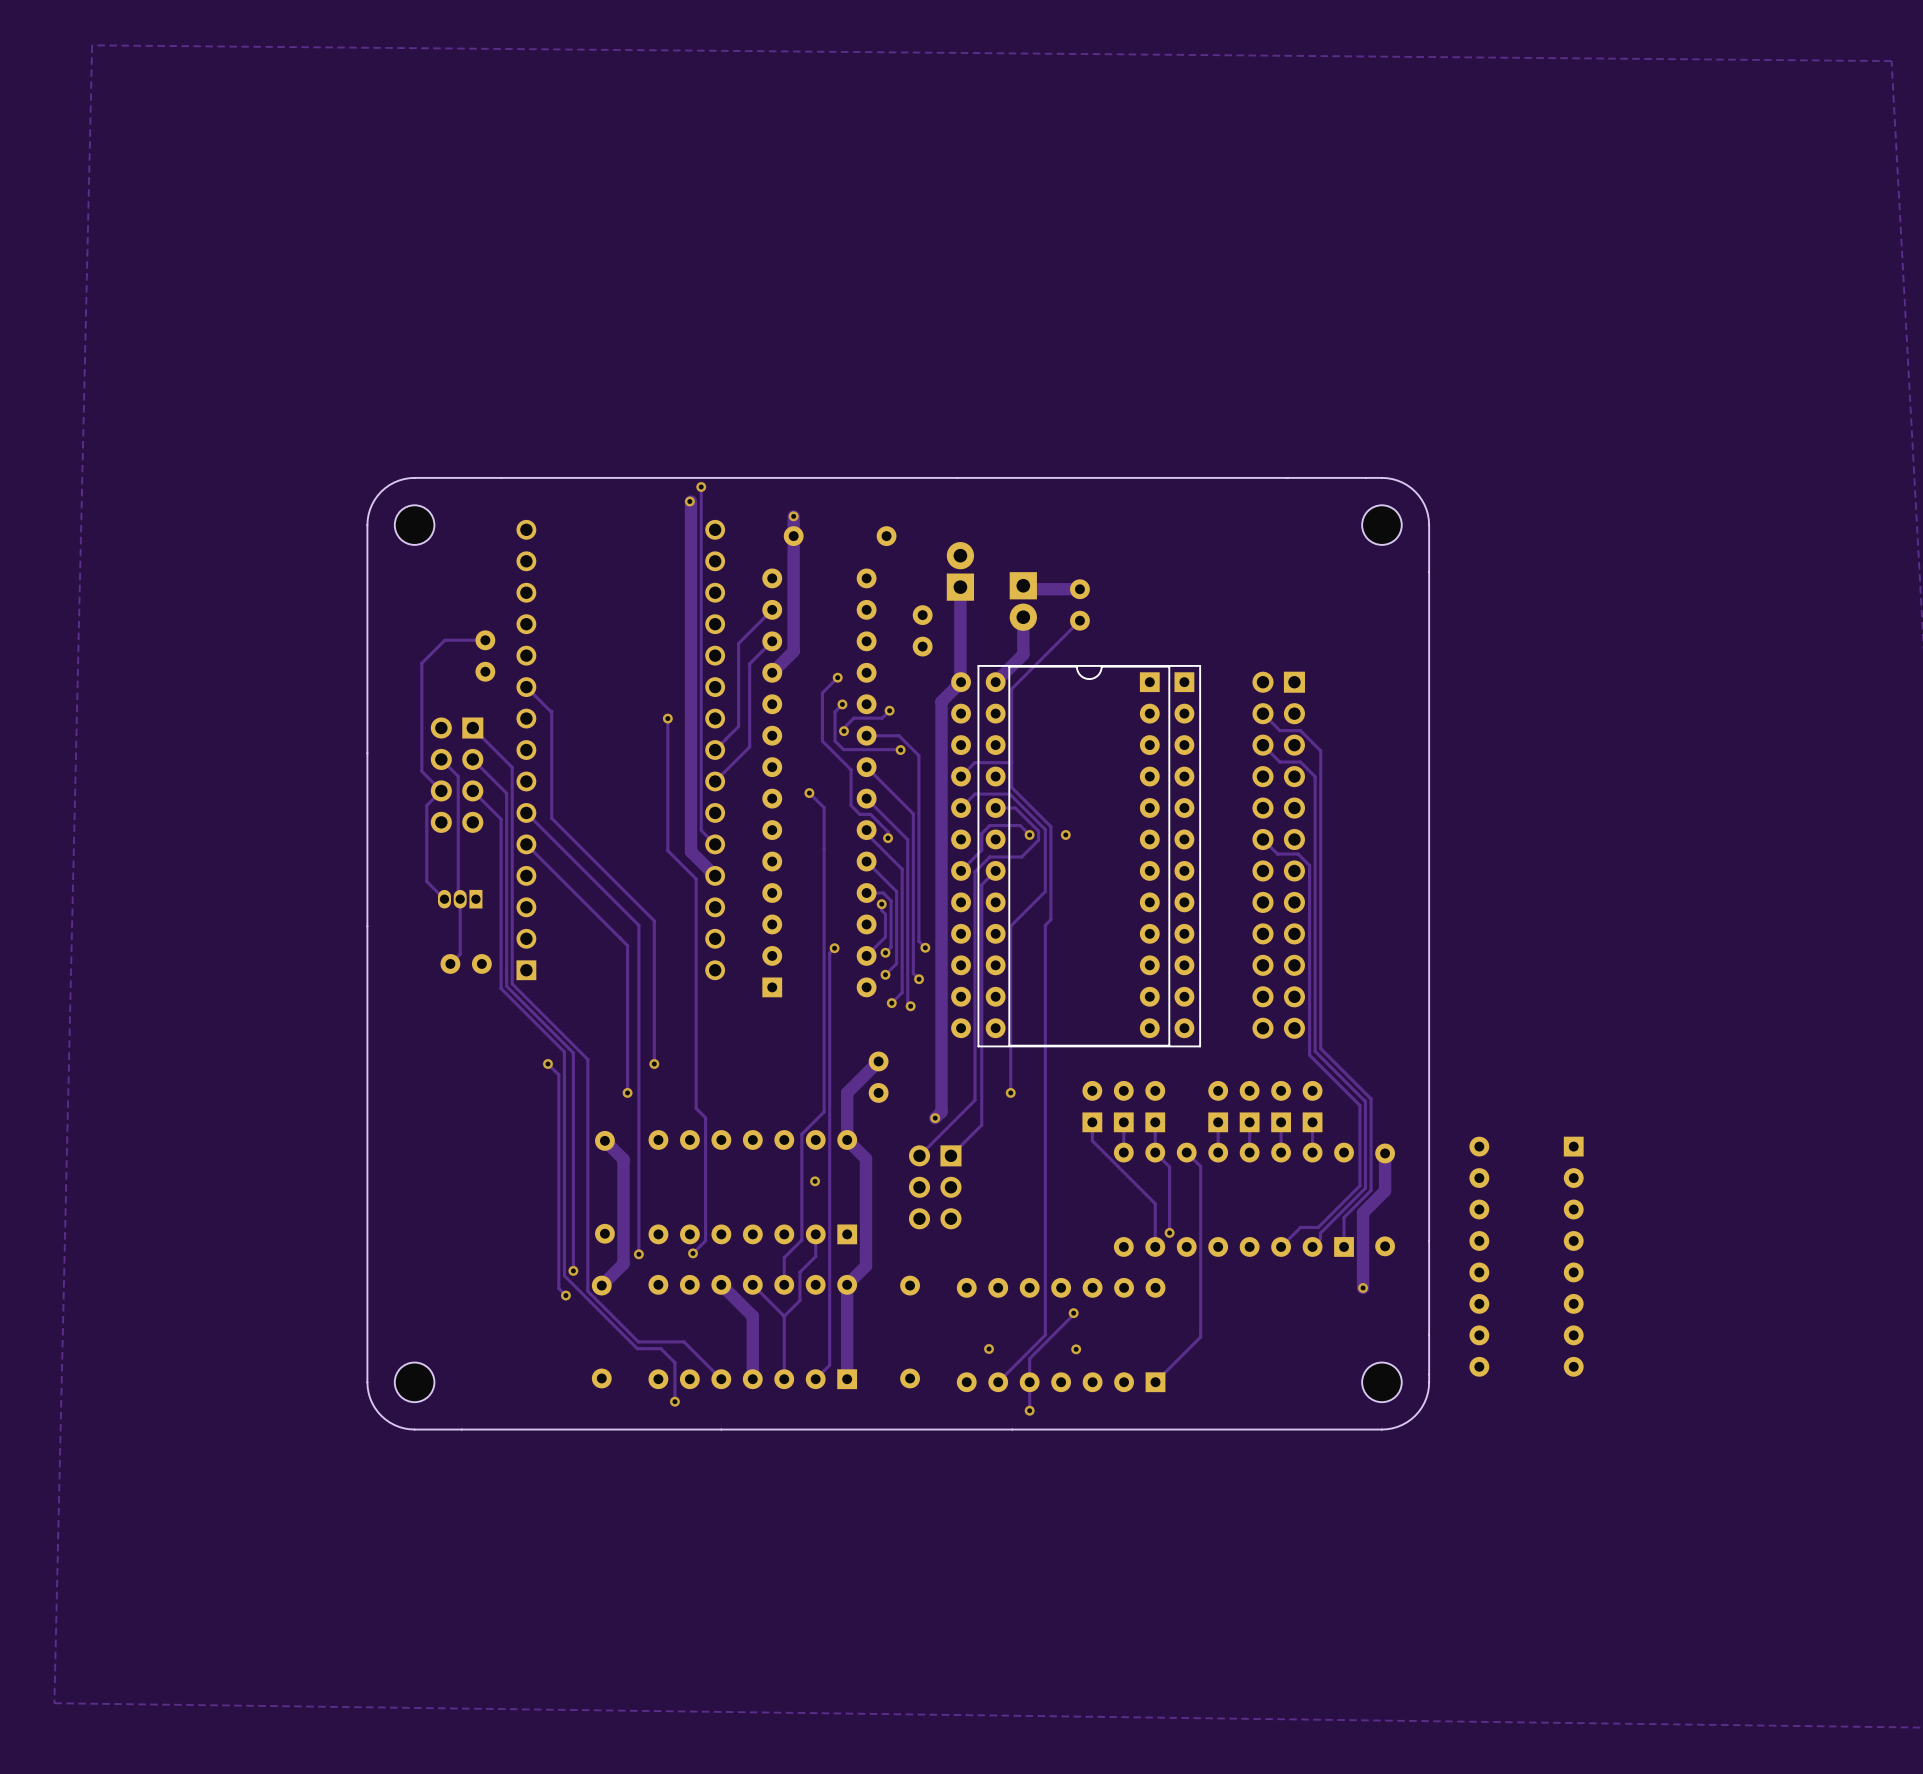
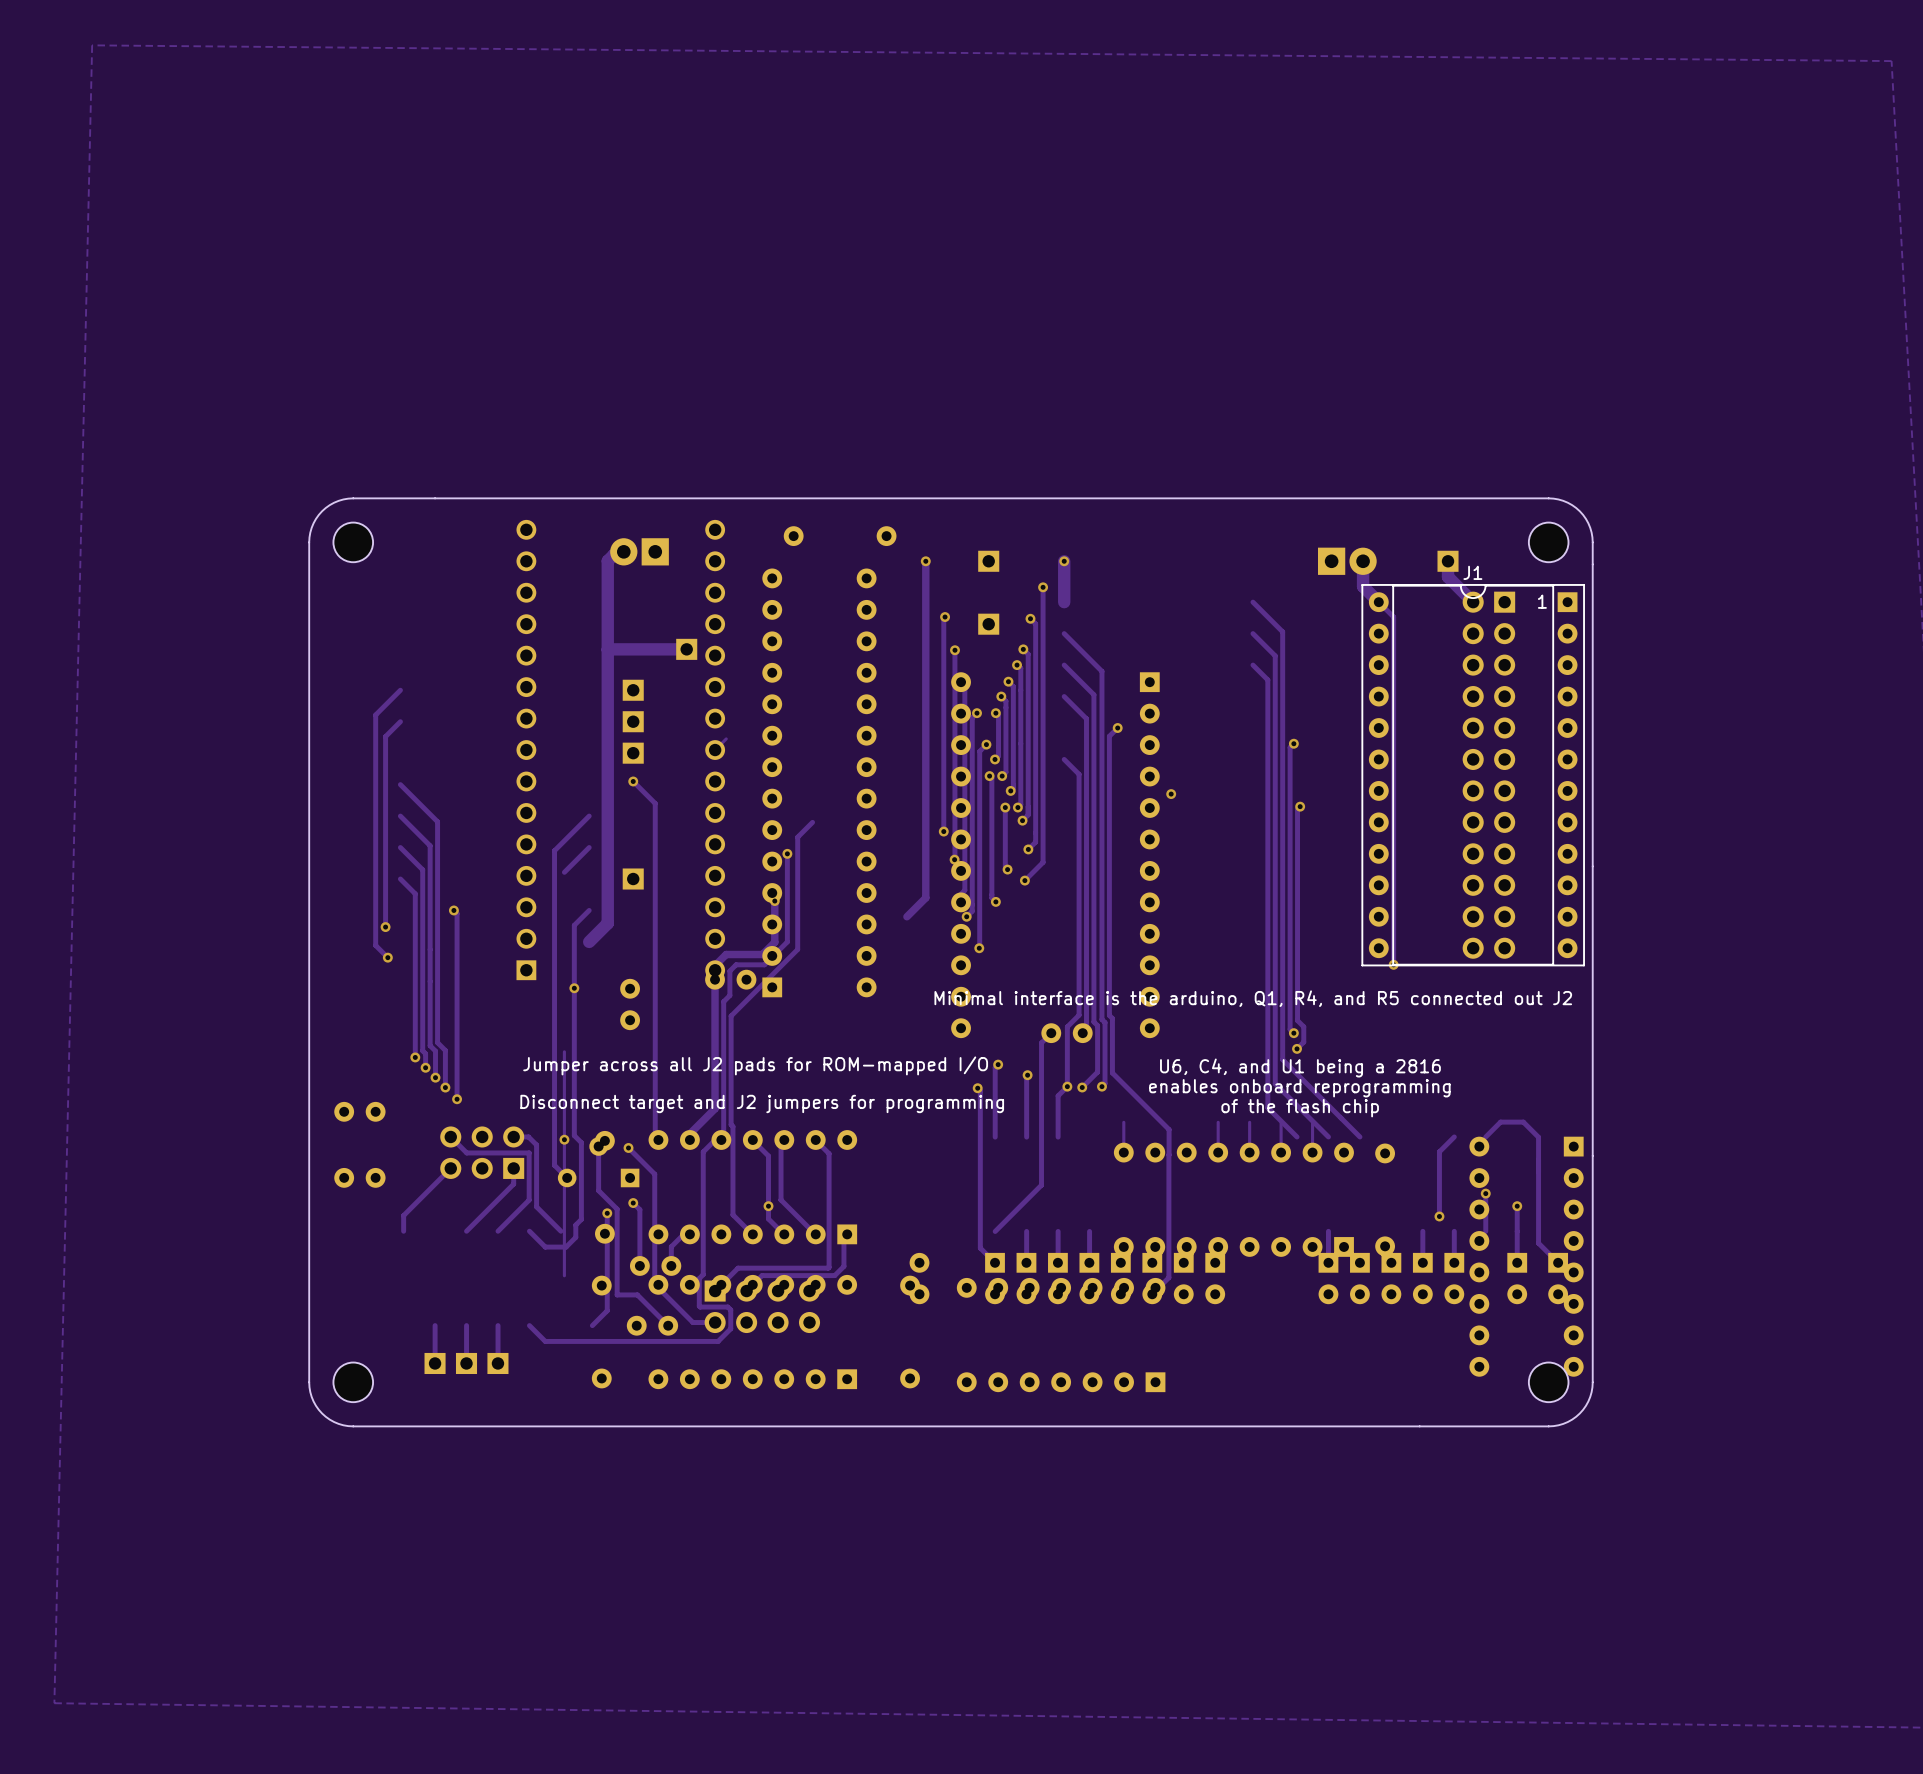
board edge: (1381, 477) (414, 477) (394, 482) (381, 491) (370, 509) (367, 525) (367, 1382) (372, 1402) (381, 1415) (399, 1426) (414, 1429) (1381, 1429) (1402, 1424) (1415, 1415) (1424, 1402) (1429, 1382) (1429, 525) (1426, 509) (1415, 491) (1397, 480) (1381, 477) -> (1548, 498) (1567, 502) (1579, 511) (1588, 523) (1592, 542) (1592, 1382) (1588, 1401) (1576, 1416) (1563, 1423) (1548, 1426) (353, 1426) (334, 1422) (318, 1409) (311, 1396) (309, 1382) (309, 542) (313, 523) (325, 507) (338, 500) (353, 498) (1548, 498)
track: (701, 486) (701, 830) (715, 844) -> none
via: (701, 486) -> none
via: (689, 501) -> none
track: (691, 501) (691, 851) (715, 875) -> none
track: (793, 516) (793, 651) (772, 672) -> none
via: (793, 516) -> none
part position: (414, 525) -> (353, 542)
part position: (1381, 525) -> (1548, 542)
part: none -> (639, 551)
track: none -> (626, 554) (613, 554) (607, 560) (607, 923) (589, 941)
track: none -> (925, 561) (925, 897) (906, 916)
via: none -> (925, 561)
part: none -> (988, 561)
track: none -> (1064, 561) (1064, 602)
via: none -> (1064, 561)
part: none -> (1347, 561)
track: none -> (1363, 561) (1363, 586) (1393, 617) (1393, 964)
track: none -> (1448, 561) (1448, 577) (1473, 602)
part: none -> (1448, 561)
part: (960, 571) -> none
track: (1023, 585) (1026, 589) (1079, 589) -> none
track: (960, 587) (961, 682) (941, 701) (941, 1111) (935, 1118) -> none
track: none -> (1043, 587) (1043, 862) (1024, 880)
via: none -> (1043, 587)
part: (1023, 601) -> none
text: none -> 1 (1542, 601)
track: none -> (1252, 602) (1282, 631) (1282, 1059) (1359, 1136)
part: (1079, 604) -> none
track: (772, 609) (738, 643) (738, 726) (726, 738) -> none
track: none -> (945, 617) (943, 831)
via: none -> (945, 617)
track: (1023, 617) (1023, 654) (995, 682) -> none
track: none -> (1030, 618) (1035, 623) (1035, 842) (1028, 849)
via: none -> (1030, 618)
track: (1079, 620) (1011, 688) (1011, 787) (1050, 826) (1050, 919) (1045, 925) (1045, 1335) (998, 1382) -> none
part: none -> (988, 624)
part: (922, 630) -> none
track: none -> (1064, 633) (1101, 671) (1101, 1019) (1105, 1022) (1105, 1083) (1101, 1086)
track: none -> (1252, 633) (1275, 655) (1275, 1083) (1328, 1136)
track: (485, 640) (444, 640) (421, 663) (421, 771) (441, 790) (426, 805) (426, 881) (444, 899) -> none
track: (772, 641) (749, 663) (749, 746) (715, 781) -> none
track: none -> (686, 649) (607, 649)
part: none -> (686, 649)
track: none -> (1023, 649) (1028, 654) (1028, 814) (1022, 820)
via: none -> (1023, 649)
track: none -> (954, 650) (954, 859)
via: none -> (954, 650)
part: (485, 656) -> none
track: none -> (1017, 665) (1020, 668) (1020, 804) (1017, 807)
via: none -> (1017, 665)
track: none -> (1064, 665) (1093, 694) (1093, 1021) (1097, 1025) (1097, 1072) (1082, 1087)
track: none -> (1252, 665) (1267, 679) (1267, 1107) (1297, 1136)
track: (837, 677) (822, 692) (822, 741) (851, 769) (851, 805) (859, 814) (870, 814) (888, 831) (888, 838) -> none
via: (837, 677) -> none
track: none -> (1008, 681) (1013, 686) (1013, 788) (1010, 790)
via: none -> (1008, 681)
track: none -> (964, 682) (964, 890) (960, 894)
track: (526, 687) (551, 711) (551, 818) (654, 920) (654, 1063) -> none
track: none -> (400, 690) (375, 715) (375, 945) (387, 957)
part: none -> (633, 690)
track: none -> (1001, 696) (1005, 701) (1005, 772) (1002, 776)
via: none -> (1001, 696)
track: none -> (1064, 696) (1086, 718) (1086, 1029) (1082, 1033)
track: (842, 704) (835, 711) (835, 741) (843, 749) (900, 750) -> none
via: (842, 704) -> none
track: (889, 710) (882, 718) (853, 718) (844, 728) (844, 731) -> none
via: (889, 710) -> none
track: none -> (977, 713) (972, 717) (972, 911) (966, 916)
via: none -> (977, 713)
track: none -> (995, 713) (998, 715) (998, 755) (995, 759)
via: none -> (995, 713)
track: (1262, 713) (1279, 730) (1300, 730) (1320, 750) (1320, 1048) (1371, 1098) (1371, 1190) (1344, 1217) (1344, 1246) -> none
track: (667, 718) (667, 850) (696, 879) (696, 1108) (705, 1117) (705, 1240) (693, 1253) -> none
via position: (667, 718) -> (633, 781)
track: none -> (400, 721) (385, 736) (385, 927)
part: none -> (633, 721)
track: (472, 728) (512, 767) (512, 983) (587, 1059) (587, 1291) (638, 1341) (684, 1341) (721, 1379) -> none
track: none -> (1117, 728) (1109, 736) (1109, 1015) (1112, 1018) (1112, 1072) (1169, 1129) (1168, 1277) (1152, 1294)
via: none -> (1117, 728)
via: (844, 731) -> none
track: (866, 735) (899, 735) (918, 755) (918, 941) (925, 947) -> none
track: none -> (1293, 743) (1290, 747) (1290, 1029) (1293, 1033)
via: none -> (1293, 743)
track: none -> (986, 744) (979, 751) (979, 948)
via: none -> (986, 744)
track: (1262, 745) (1279, 762) (1300, 762) (1315, 776) (1315, 1051) (1365, 1101) (1365, 1188) (1320, 1233) (1320, 1239) (1312, 1246) -> none
via: (900, 750) -> none
part: none -> (633, 753)
track: (441, 759) (458, 776) (460, 954) (450, 963) -> none
track: (472, 759) (506, 793) (506, 986) (573, 1052) (573, 1270) -> none
via: none -> (995, 759)
track: none -> (1064, 759) (1079, 774) (1079, 1015) (1067, 1026) (1067, 1086) (1058, 1095) (1058, 1137)
track: (1011, 762) (974, 762) (961, 776) -> none
track: (866, 767) (913, 813) (913, 973) (919, 979) -> none
part: (457, 775) -> none
J1: none -> (1473, 775)
track: none -> (989, 776) (991, 778) (991, 897) (995, 901)
via: none -> (989, 776)
via: none -> (1002, 776)
track: none -> (633, 781) (655, 803) (655, 1136)
track: none -> (400, 784) (437, 821) (437, 1042) (445, 1050) (445, 1087)
track: (472, 790) (501, 819) (501, 988) (564, 1051) -> none
via: none -> (1010, 790)
track: (809, 793) (824, 807) (824, 1111) (801, 1134) (801, 1240) (784, 1257) (784, 1284) -> none
via: (809, 793) -> none
via: none -> (1171, 794)
track: (866, 798) (907, 839) (907, 1003) (910, 1006) -> none
track: none -> (1300, 806) (1297, 809) (1297, 1020) (1303, 1026) (1303, 1042) (1297, 1048)
via: none -> (1300, 806)
track: none -> (1005, 807) (1005, 870)
via: none -> (1005, 807)
via: none -> (1017, 807)
track: (961, 808) (974, 794) (1009, 794) (1045, 829) (1045, 891) (1010, 926) (1010, 1092) -> none
track: (995, 808) (1015, 808) (1038, 831) (1038, 840) (1021, 856) (989, 856) (974, 871) (974, 1100) (919, 1155) -> none
track: (526, 812) (638, 925) (638, 1254) -> none
track: none -> (400, 816) (430, 845) (430, 1045) (435, 1051) (435, 1077)
track: none -> (589, 816) (554, 850) (554, 1165) (567, 1177)
via: none -> (1022, 820)
track: none -> (812, 822) (797, 837) (797, 949) (731, 1016) (732, 1214) (749, 1231)
track: (866, 830) (866, 833) (902, 869) (902, 992) (891, 1003) -> none
via: none -> (943, 831)
track: (1029, 834) (1020, 825) (989, 825) (981, 833) (981, 850) (961, 870) -> none
via: (1029, 834) -> none
via: (1065, 834) -> none
via: (888, 838) -> none
track: (1262, 839) (1277, 854) (1298, 854) (1309, 865) (1309, 1055) (1359, 1105) (1359, 1185) (1318, 1227) (1300, 1227) (1281, 1246) -> none
track: (526, 844) (627, 945) (627, 1092) -> none
track: none -> (400, 847) (422, 869) (422, 1050) (425, 1053) (425, 1067)
track: none -> (589, 847) (564, 872)
via: none -> (1028, 849)
track: none -> (787, 853) (787, 941) (764, 964) (736, 964) (729, 971) (729, 995) (723, 1001) (723, 1131) (703, 1151) (703, 1274) (699, 1278) (699, 1306) (727, 1307) (730, 1309) (730, 1328) (718, 1341) (545, 1341) (529, 1325)
via: none -> (787, 853)
part position: (1278, 855) -> (1488, 775)
part: (1089, 856) -> none
via: none -> (954, 859)
track: (866, 861) (896, 891) (896, 963) (885, 974) -> none
via: none -> (1007, 869)
track: (995, 870) (981, 884) (981, 1125) (950, 1155) -> none
track: none -> (400, 879) (415, 893) (415, 1057)
part: none -> (633, 879)
via: none -> (1024, 880)
track: (866, 893) (883, 893) (891, 900) (891, 947) (885, 952) -> none
part: (460, 899) -> none
track: none -> (774, 901) (774, 942) (762, 954) (726, 954) (715, 965) (715, 1108) (686, 1137)
via: none -> (774, 901)
via: none -> (995, 901)
track: (881, 904) (881, 910) (885, 914) (885, 937) (866, 955) -> none
via: (881, 904) -> none
track: none -> (453, 910) (457, 913) (457, 1099)
via: none -> (453, 910)
track: none -> (589, 910) (574, 925) (574, 1135) (581, 1142) (581, 1219) (575, 1225) (575, 1237) (566, 1247) (545, 1247) (529, 1231)
via: none -> (966, 916)
via: none -> (385, 927)
via: (925, 947) -> none
track: (834, 948) (829, 953) (829, 1365) (815, 1379) -> none
via: (834, 948) -> none
via: none -> (979, 948)
via: (885, 952) -> none
via: none -> (387, 957)
part: (466, 963) -> none
via: none -> (1393, 964)
via: (885, 974) -> none
part: none -> (730, 979)
via: (919, 979) -> none
via: none -> (574, 988)
text: none -> Minimal interface is the arduino, Q1, R4, and R5 connected out J2 (1253, 998)
via: (891, 1003) -> none
part: none -> (630, 1004)
via: (910, 1006) -> none
track: none -> (1051, 1033) (1041, 1042) (1041, 1185) (995, 1231)
part: none -> (1067, 1033)
via: none -> (1293, 1033)
via: none -> (1297, 1048)
via: none -> (415, 1057)
track: (878, 1061) (847, 1092) (847, 1139) (866, 1158) (866, 1265) (847, 1284) (847, 1379) -> none
track: (547, 1063) (558, 1074) (558, 1288) (565, 1295) -> none
via: (547, 1063) -> none
via: (654, 1063) -> none
track: none -> (998, 1064) (995, 1067) (995, 1137)
via: none -> (998, 1064)
text: none -> Jumper across all J2 pads for ROM-mapped I/O (755, 1065)
via: none -> (425, 1067)
text: none -> U6, C4, and U1 being a 2816 (1300, 1068)
track: none -> (1027, 1075) (1026, 1137)
via: none -> (1027, 1075)
via: none -> (435, 1077)
part: (878, 1077) -> none
via: none -> (1067, 1086)
via: none -> (1101, 1086)
via: none -> (445, 1087)
via: none -> (1082, 1087)
track: none -> (977, 1088) (980, 1090) (980, 1248) (995, 1262)
via: none -> (977, 1088)
text: none -> enables onboard reprogramming (1299, 1088)
via: (627, 1092) -> none
via: (1010, 1092) -> none
via: none -> (457, 1099)
text: none -> Disconnect target and J2 jumpers for programming (762, 1103)
part: (1092, 1106) -> none
part: (1123, 1106) -> none
part: (1155, 1106) -> none
part: (1218, 1106) -> none
part: (1249, 1106) -> none
part: (1281, 1106) -> none
part: (1312, 1106) -> none
text: none -> of the flash chip (1300, 1108)
part: none -> (359, 1111)
via: (935, 1118) -> none
track: (1092, 1122) (1092, 1140) (1155, 1203) (1155, 1246) -> none
track: (1155, 1122) (1155, 1152) (1169, 1166) (1169, 1232) -> none
track: none -> (450, 1136) (466, 1152) (529, 1152) (529, 1200) (498, 1231)
track: none -> (513, 1136) (528, 1136) (536, 1144) (536, 1206) (560, 1231)
track: none -> (1454, 1136) (1439, 1151) (1439, 1216)
track: none -> (1485, 1136) (1500, 1122) (1523, 1122) (1538, 1137) (1538, 1243) (1558, 1262)
track: none -> (749, 1137) (768, 1156) (768, 1218) (781, 1231)
track: none -> (781, 1137) (781, 1200) (812, 1231)
track: none -> (812, 1137) (829, 1153) (829, 1267) (738, 1268) (715, 1291)
via: none -> (564, 1139)
track: (604, 1140) (623, 1159) (623, 1263) (601, 1285) -> none
track: none -> (598, 1146) (598, 1190) (617, 1209) (617, 1294) (637, 1294) (668, 1325)
track: none -> (628, 1147) (654, 1174) (654, 1284) (692, 1322) (715, 1322)
via: none -> (628, 1147)
part: none -> (482, 1152)
track: (1186, 1152) (1200, 1166) (1200, 1337) (1155, 1382) -> none
track: (1385, 1153) (1385, 1190) (1363, 1212) (1363, 1287) -> none
part: none -> (598, 1162)
track: none -> (450, 1168) (403, 1215) (403, 1231)
track: none -> (513, 1168) (513, 1184) (466, 1231)
part: none -> (359, 1177)
via: (815, 1181) -> none
part: (935, 1187) -> none
track: none -> (1485, 1193) (1485, 1231)
via: none -> (1485, 1193)
track: none -> (633, 1203) (639, 1209) (639, 1265)
via: none -> (633, 1203)
via: none -> (768, 1206)
track: none -> (1517, 1206) (1517, 1262)
via: none -> (1517, 1206)
track: none -> (607, 1213) (607, 1310) (592, 1325)
via: none -> (607, 1213)
via: none -> (1439, 1216)
track: none -> (686, 1231) (671, 1246) (671, 1265)
track: none -> (843, 1231) (843, 1266) (834, 1275) (762, 1275) (746, 1291)
track: none -> (1026, 1231) (1026, 1262)
track: none -> (1058, 1231) (1057, 1262)
track: none -> (1089, 1231) (1089, 1262)
track: none -> (1328, 1231) (1328, 1262)
track: none -> (1422, 1231) (1422, 1262)
track: none -> (1454, 1231) (1454, 1262)
via: (1169, 1232) -> none
track: (815, 1234) (815, 1256) (799, 1272) (799, 1300) (784, 1316) -> none
via: (693, 1253) -> none
via: (638, 1254) -> none
part: none -> (655, 1265)
via: (573, 1270) -> none
track: (564, 1275) (637, 1348) (660, 1348) (674, 1362) (674, 1401) -> none
part: none -> (919, 1278)
part: none -> (995, 1278)
part: none -> (1026, 1278)
part: none -> (1057, 1278)
part: none -> (1089, 1278)
part: none -> (1120, 1278)
part: none -> (1152, 1278)
part: none -> (1183, 1278)
part: none -> (1215, 1278)
part: none -> (1328, 1278)
part: none -> (1359, 1278)
part: none -> (1391, 1278)
part: none -> (1422, 1278)
part: none -> (1454, 1278)
part: none -> (1517, 1278)
part: none -> (1558, 1278)
track: (721, 1284) (752, 1316) (752, 1379) -> none
track: (752, 1284) (784, 1316) -> none
via: (1363, 1287) -> none
via: (565, 1295) -> none
part: none -> (762, 1306)
track: (1073, 1313) (1029, 1358) (1029, 1410) -> none
via: (1073, 1313) -> none
track: (784, 1316) (784, 1379) -> none
track: none -> (435, 1325) (435, 1363)
track: none -> (466, 1325) (466, 1363)
track: none -> (498, 1325) (498, 1363)
part: none -> (652, 1325)
via: (989, 1349) -> none
via: (1076, 1349) -> none
part: none -> (435, 1363)
part: none -> (466, 1363)
part: none -> (497, 1363)
part position: (414, 1382) -> (353, 1382)
part position: (1381, 1382) -> (1548, 1382)
via: (674, 1401) -> none
via: (1029, 1410) -> none

